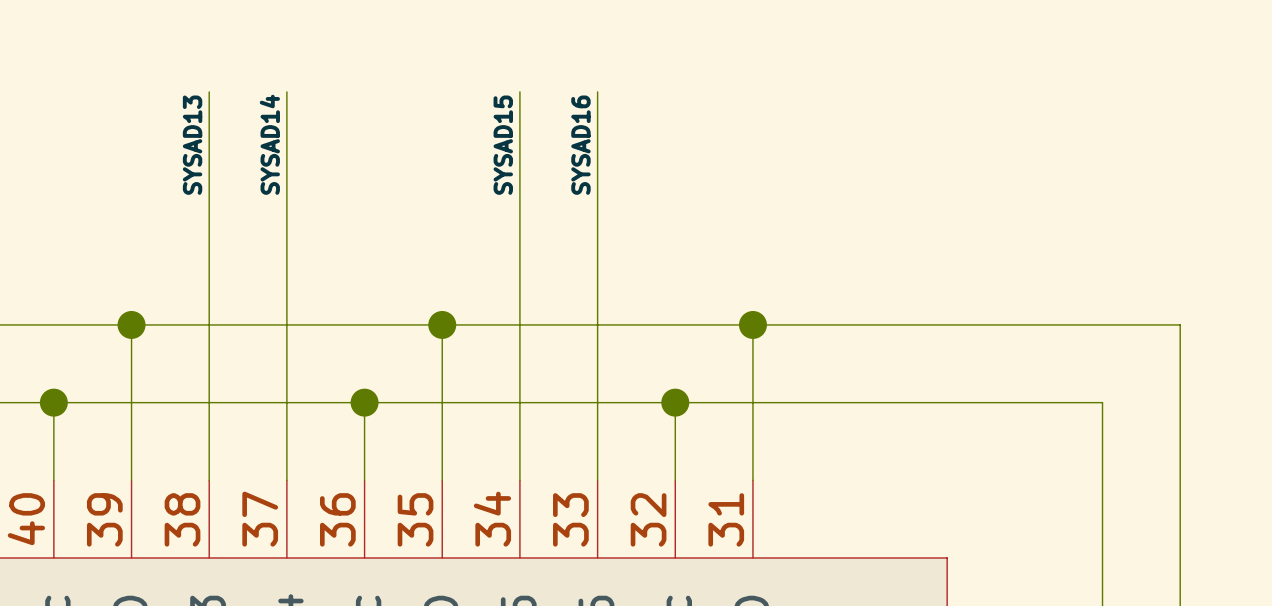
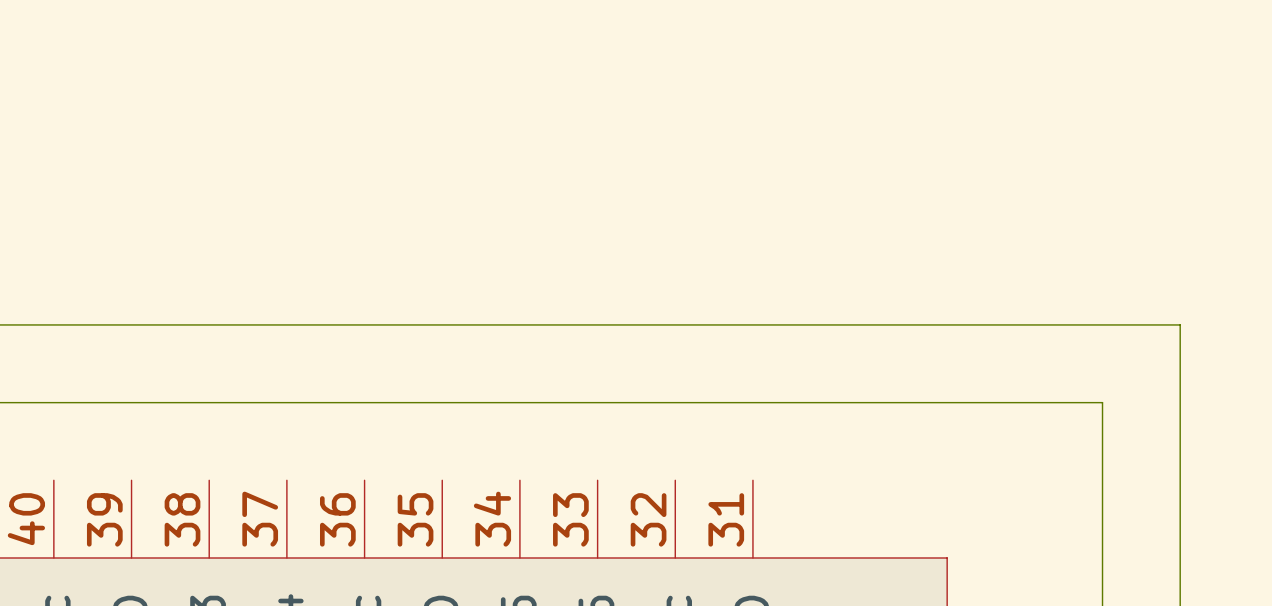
wire: (209, 91) (209, 480) -> none
wire: (286, 91) (286, 480) -> none
wire: (519, 91) (519, 480) -> none
wire: (597, 91) (597, 480) -> none
label: SYSAD14 (269, 144) -> none
label: SYSAD13 (192, 145) -> none
label: SYSAD15 (503, 145) -> none
label: SYSAD16 (580, 145) -> none
wire: (131, 324) (131, 480) -> none
junction: (131, 324) -> none
wire: (442, 324) (442, 480) -> none
junction: (442, 324) -> none
wire: (752, 324) (752, 480) -> none
junction: (752, 324) -> none
wire: (53, 402) (53, 480) -> none
junction: (53, 402) -> none
wire: (364, 402) (364, 480) -> none
junction: (364, 402) -> none
wire: (675, 402) (675, 480) -> none
junction: (675, 402) -> none

